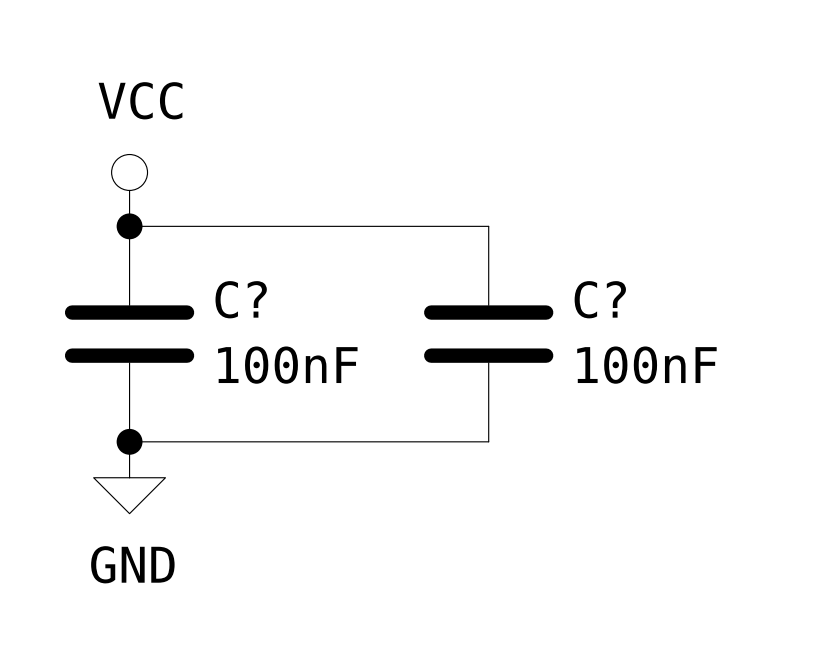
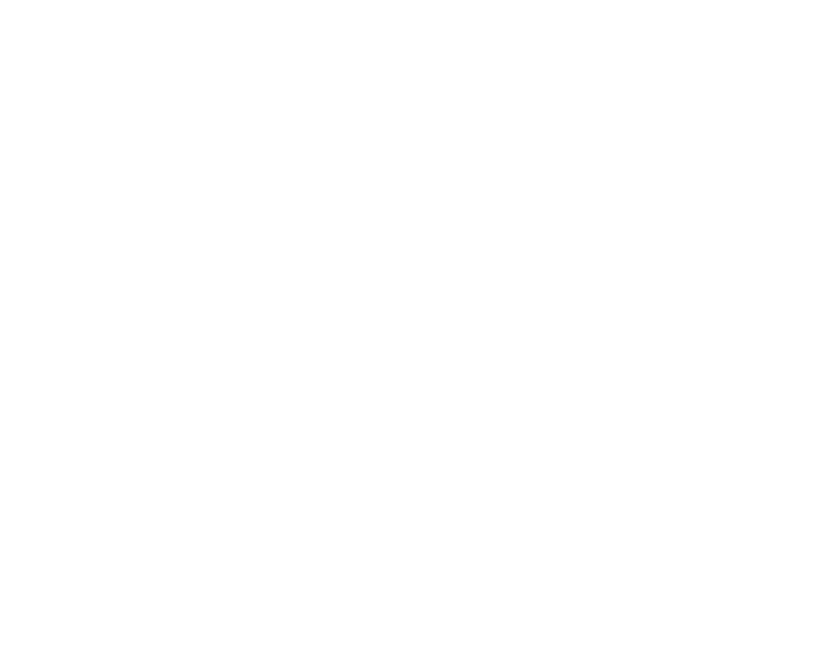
power symbol: VCC (129, 190) -> none
wire: (129, 226) (488, 226) -> none
junction: (129, 226) -> none
C?: 100nF (129, 334) -> none
C?: 100nF (488, 334) -> none
wire: (129, 441) (488, 441) -> none
junction: (129, 441) -> none
power symbol: GND (129, 477) -> none

